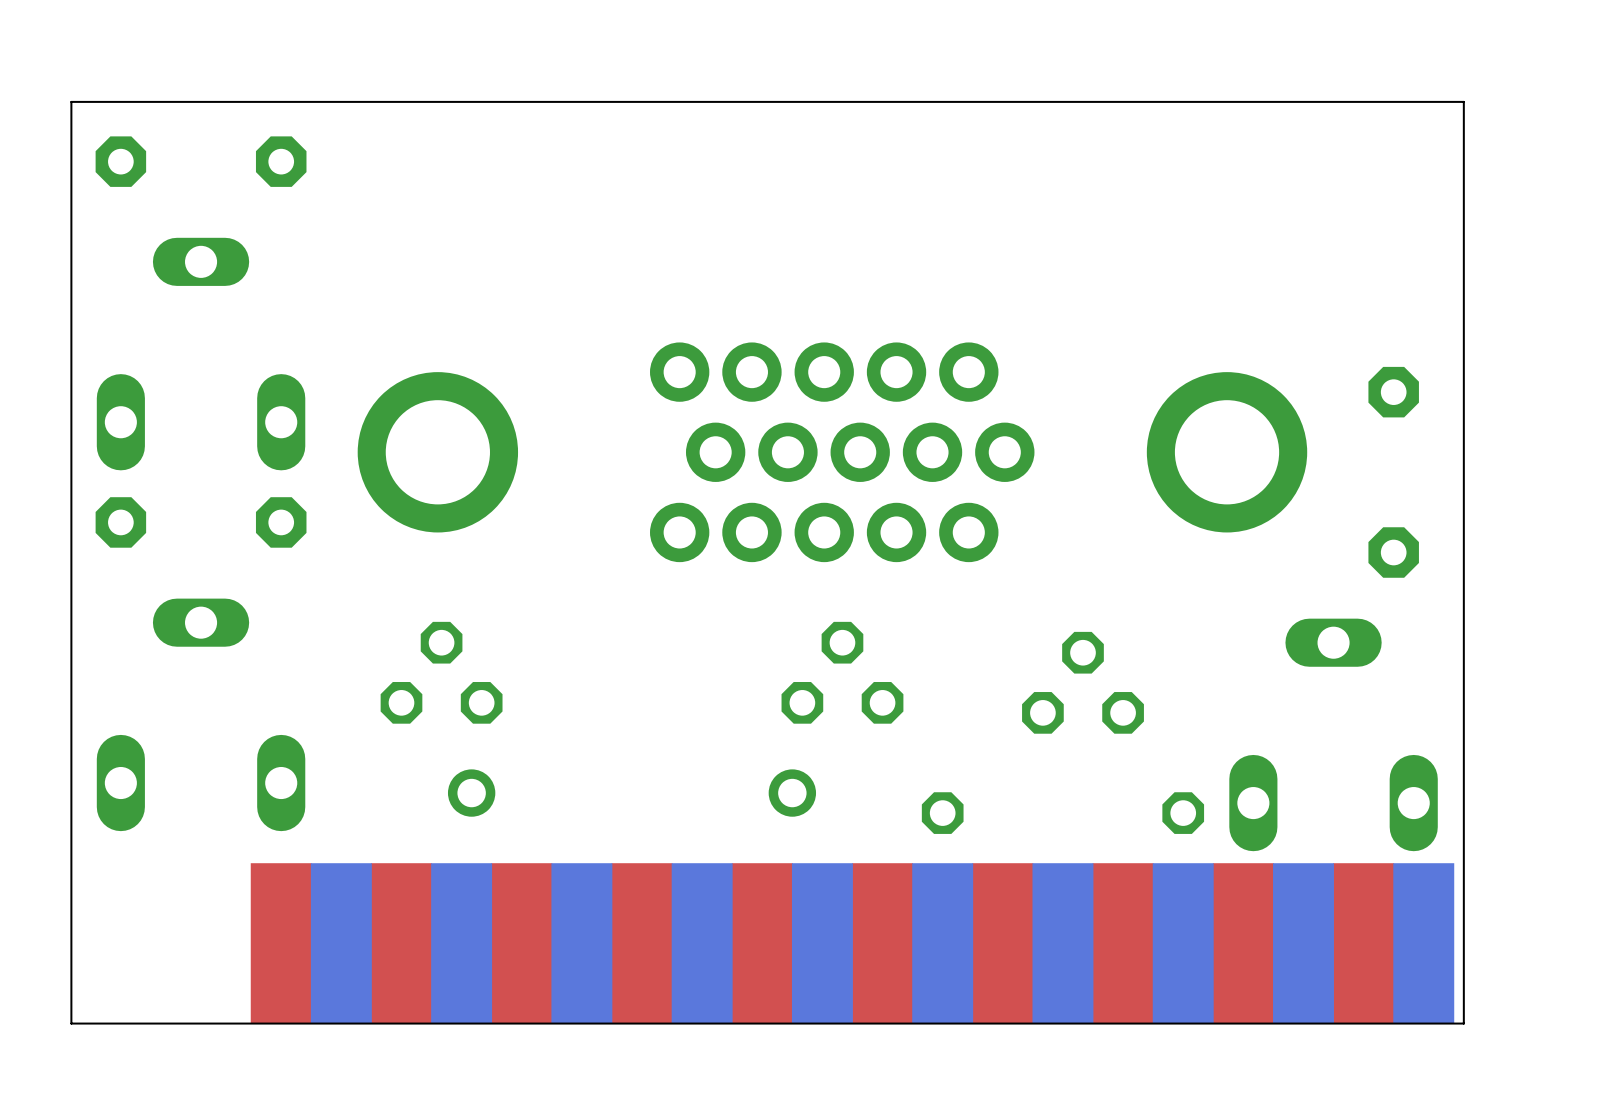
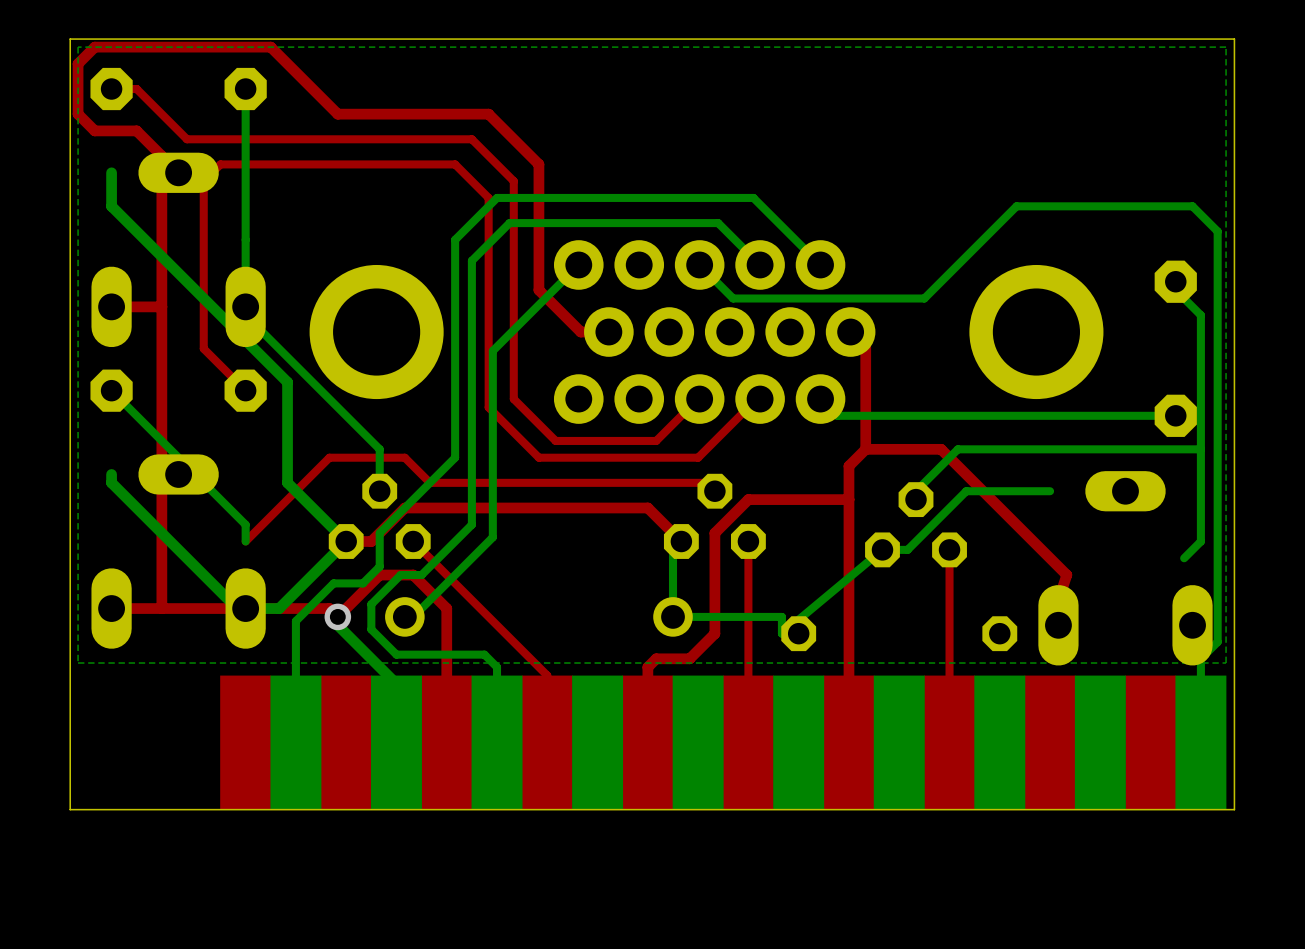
bottom zone outline: none -> (1226, 47) (78, 47) (78, 663) (1226, 663) (1226, 47)
top track: none -> (111, 89) (136, 89) (186, 139) (471, 139) (513, 181) (513, 399) (555, 440) (656, 440) (699, 399)
bottom track: none -> (245, 89) (245, 315) (379, 449) (379, 491)
bottom track: none -> (111, 172) (111, 206) (287, 382) (287, 482) (346, 541) (279, 608) (237, 608) (111, 482) (111, 474)
bottom track: none -> (578, 264) (492, 350) (492, 537) (413, 616) (404, 616)
bottom track: none -> (699, 264) (733, 298) (924, 298) (1016, 206) (1192, 206) (1217, 231) (1217, 642) (1200, 658) (1200, 742)
bottom track: none -> (760, 264) (718, 223) (509, 223) (471, 260) (471, 524) (421, 575) (400, 575) (371, 604) (371, 629) (396, 654) (484, 654) (497, 667) (497, 742)
bottom track: none -> (820, 264) (753, 197) (497, 197) (455, 239) (455, 457) (379, 533) (379, 566) (362, 583) (333, 583) (295, 621) (295, 742)
bottom track: none -> (1167, 281) (1200, 315) (1200, 541) (1184, 558)
top track: none -> (161, 306) (111, 306)
top track: none -> (608, 332) (580, 332) (538, 290) (538, 164) (488, 114) (337, 114) (270, 47) (94, 47) (78, 63) (78, 114) (94, 130) (136, 130) (161, 156) (161, 608)
top track: none -> (850, 332) (865, 347) (865, 449)
bottom track: none -> (111, 390) (245, 524) (245, 541)
top track: none -> (245, 390) (203, 348) (203, 181) (220, 164) (455, 164) (488, 197) (488, 407) (538, 457) (698, 457) (756, 399) (760, 399)
bottom track: none -> (820, 399) (837, 415) (1167, 415)
top track: none -> (865, 449) (848, 466) (848, 742)
top track: none -> (865, 449) (941, 449) (1066, 575) (1050, 625)
bottom track: none -> (1200, 449) (957, 449) (916, 491) (916, 499)
top track: none -> (714, 491) (706, 482) (430, 482) (404, 457) (329, 457) (245, 541)
bottom track: none -> (1050, 491) (966, 491) (907, 549) (882, 549) (781, 633) (781, 616) (673, 616) (673, 549) (681, 541)
top track: none -> (848, 499) (748, 499) (714, 533) (714, 633) (689, 658) (656, 658) (647, 667) (647, 742)
top track: none -> (413, 541) (547, 675) (547, 742)
top track: none -> (681, 541) (647, 507) (404, 507) (371, 541) (346, 541)
top track: none -> (748, 541) (748, 742)
top track: none -> (949, 549) (949, 742)
top track: none -> (111, 608) (329, 608) (337, 616) (379, 575) (413, 575) (446, 608) (446, 742)
bottom track: none -> (337, 616) (337, 625) (396, 683) (396, 742)
via: none -> (337, 616)

